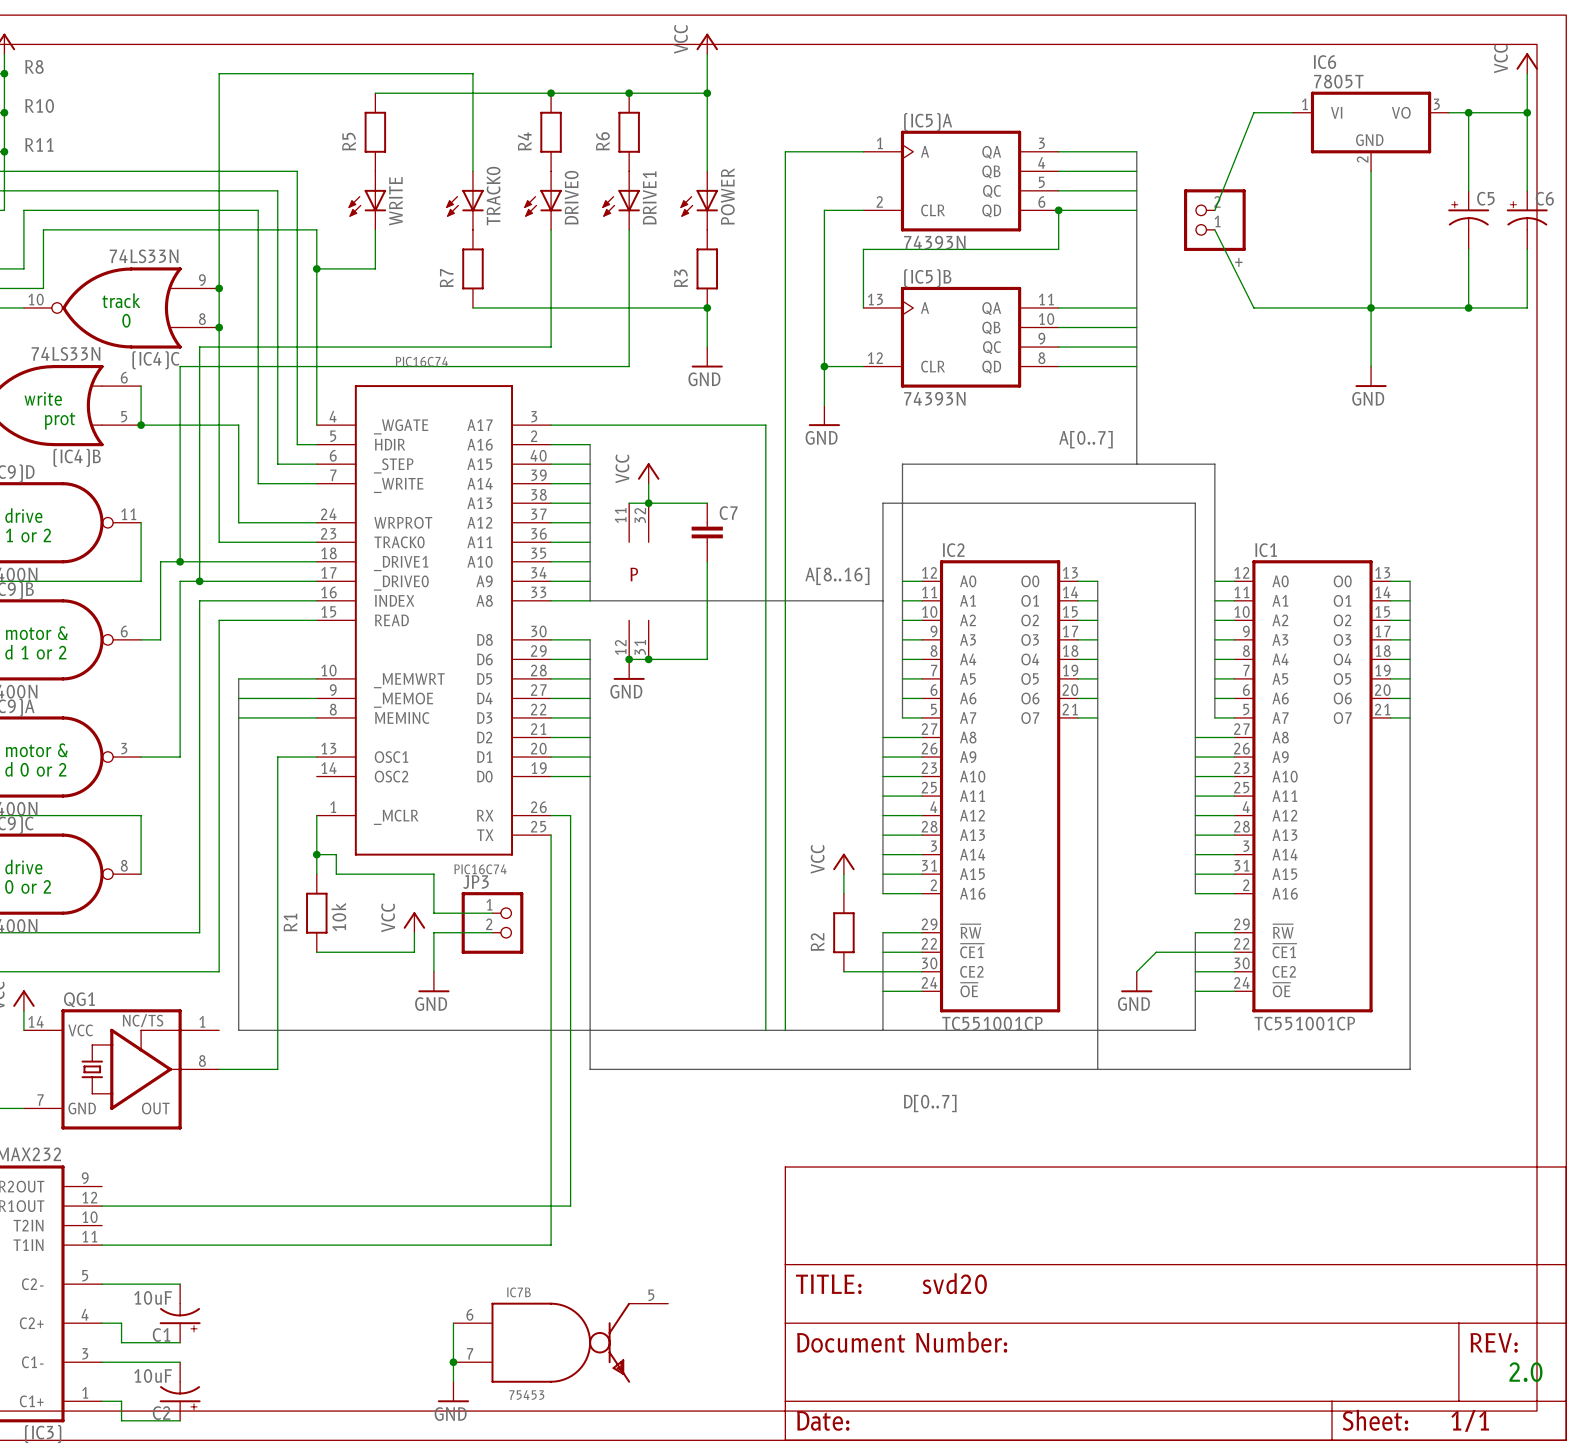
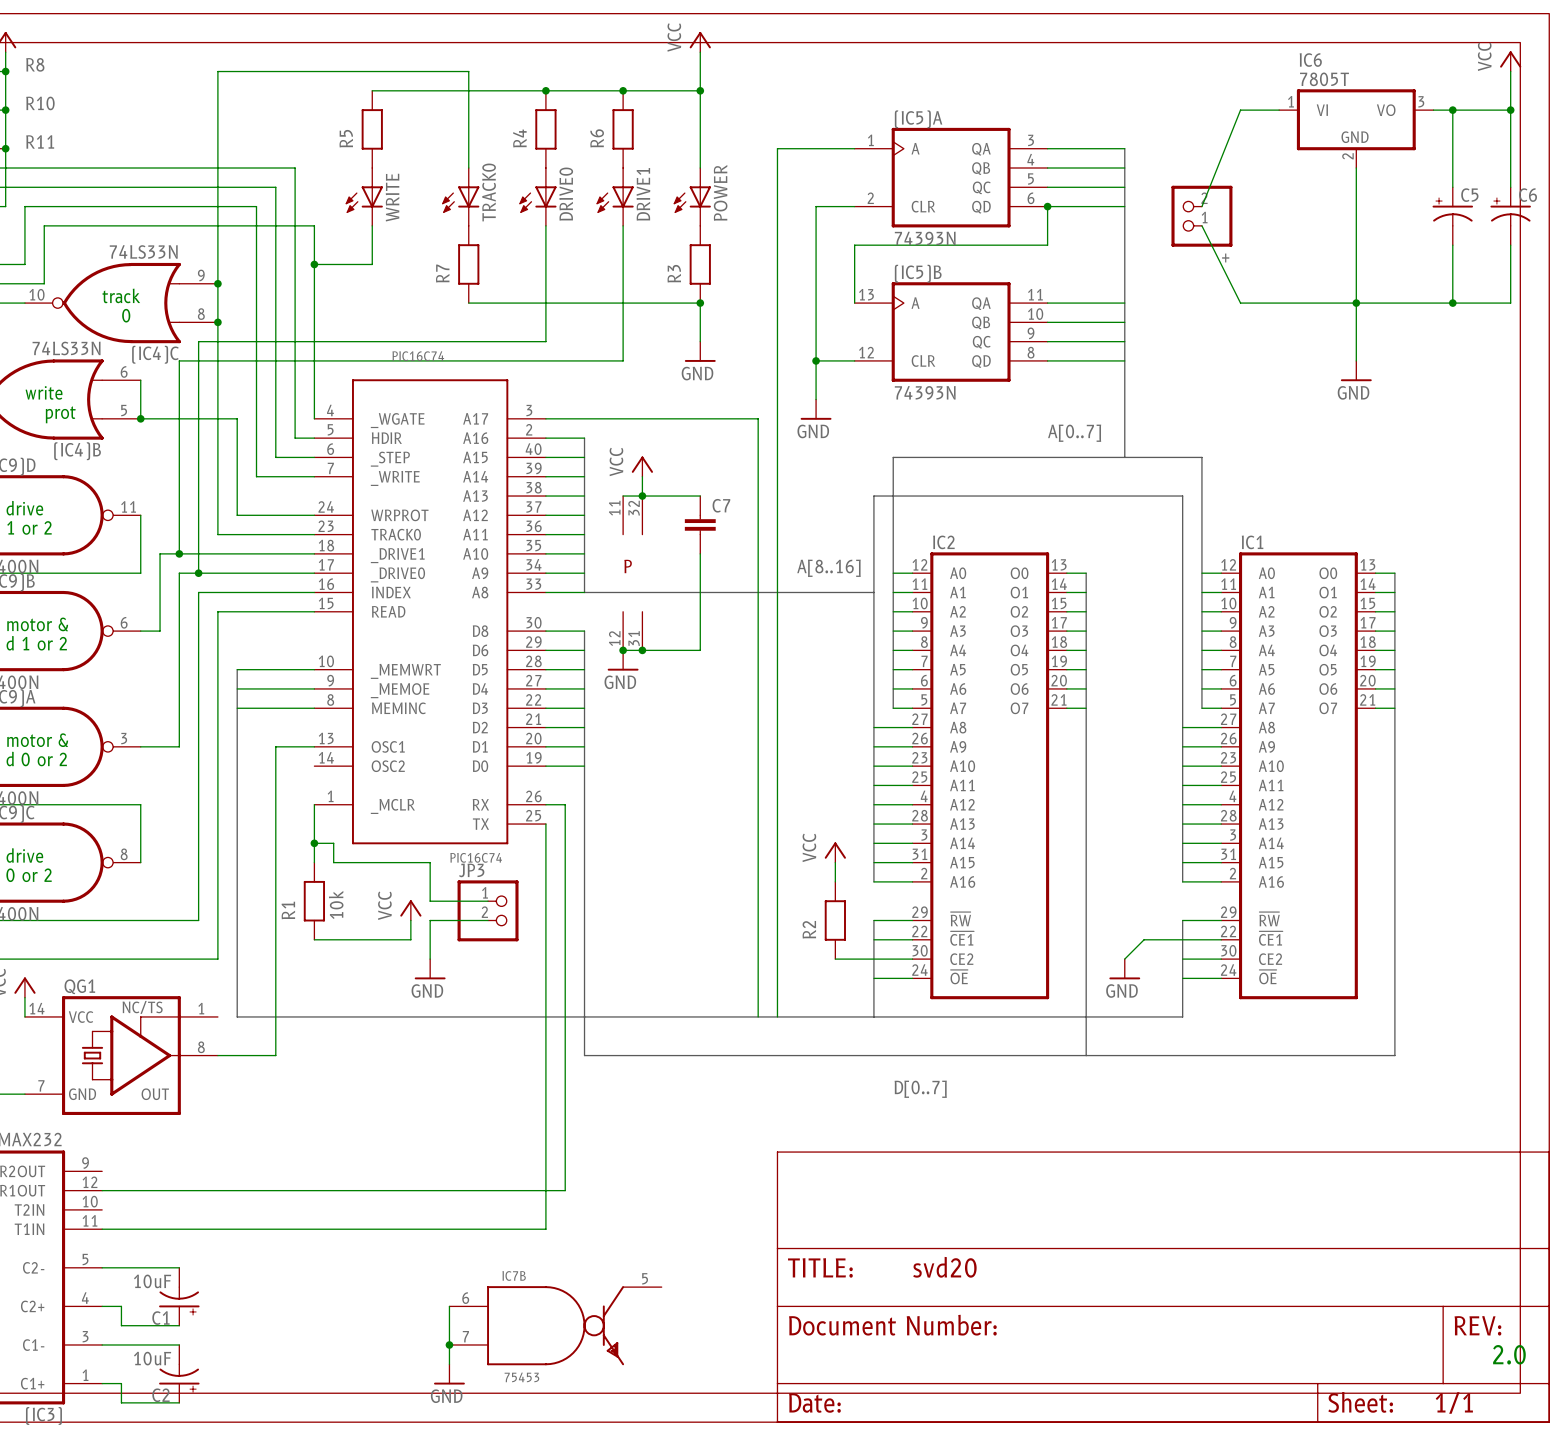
IC2 value: TC551001CP (992, 1023) -> none
IC1 value: TC551001CP (1304, 1023) -> none

